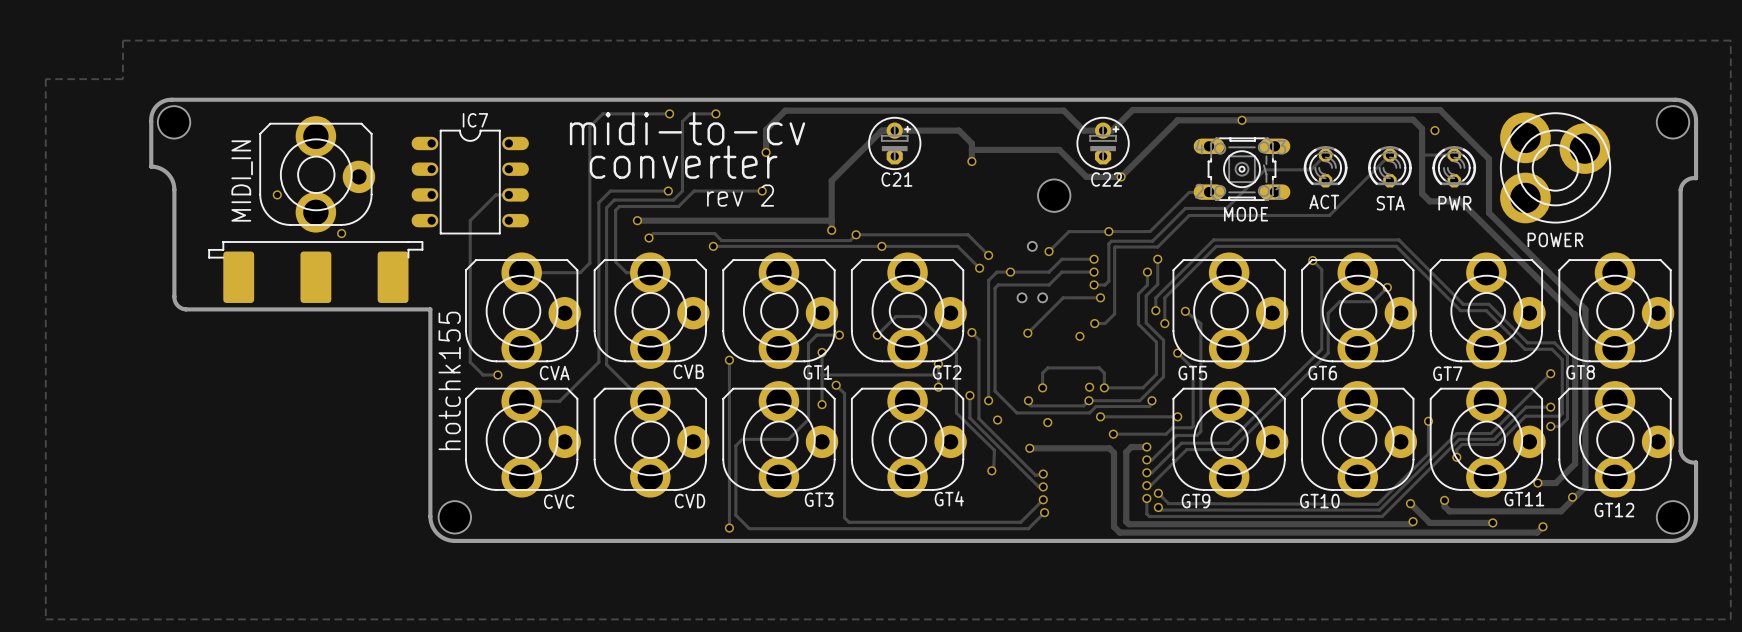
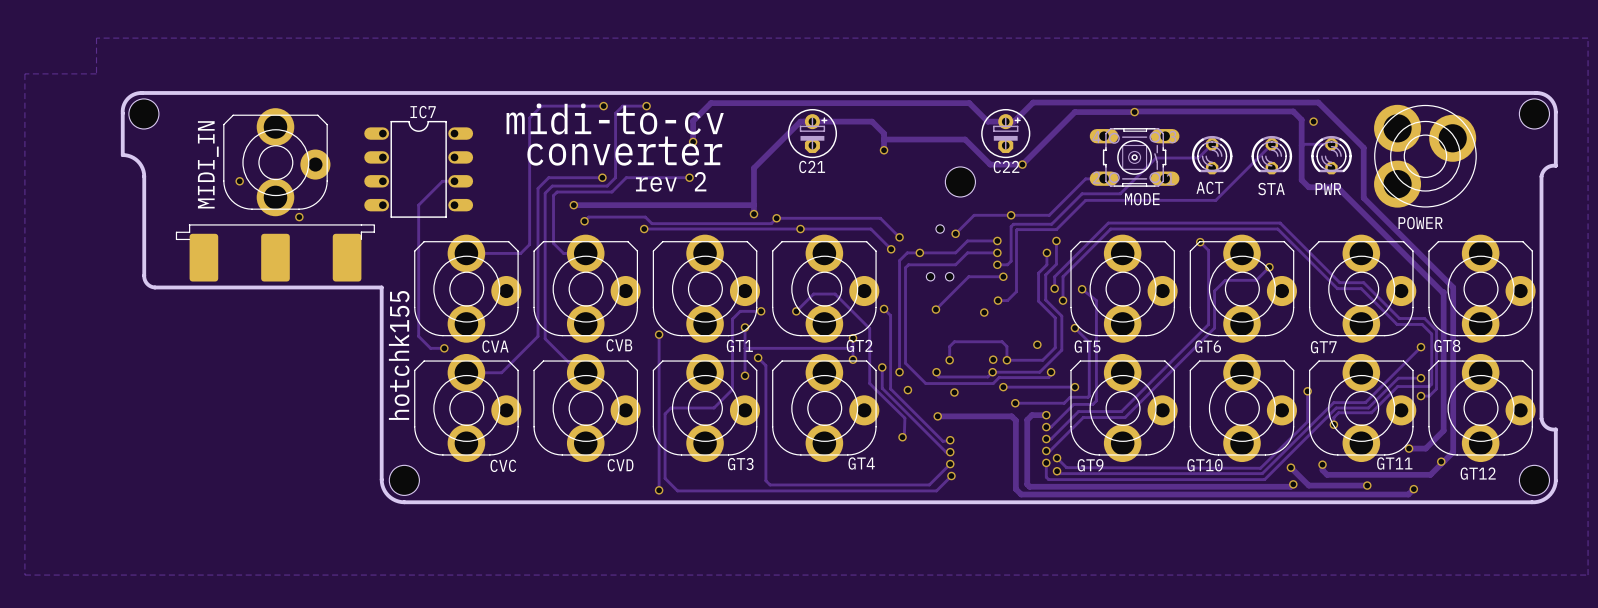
via: none -> (1037, 344)

